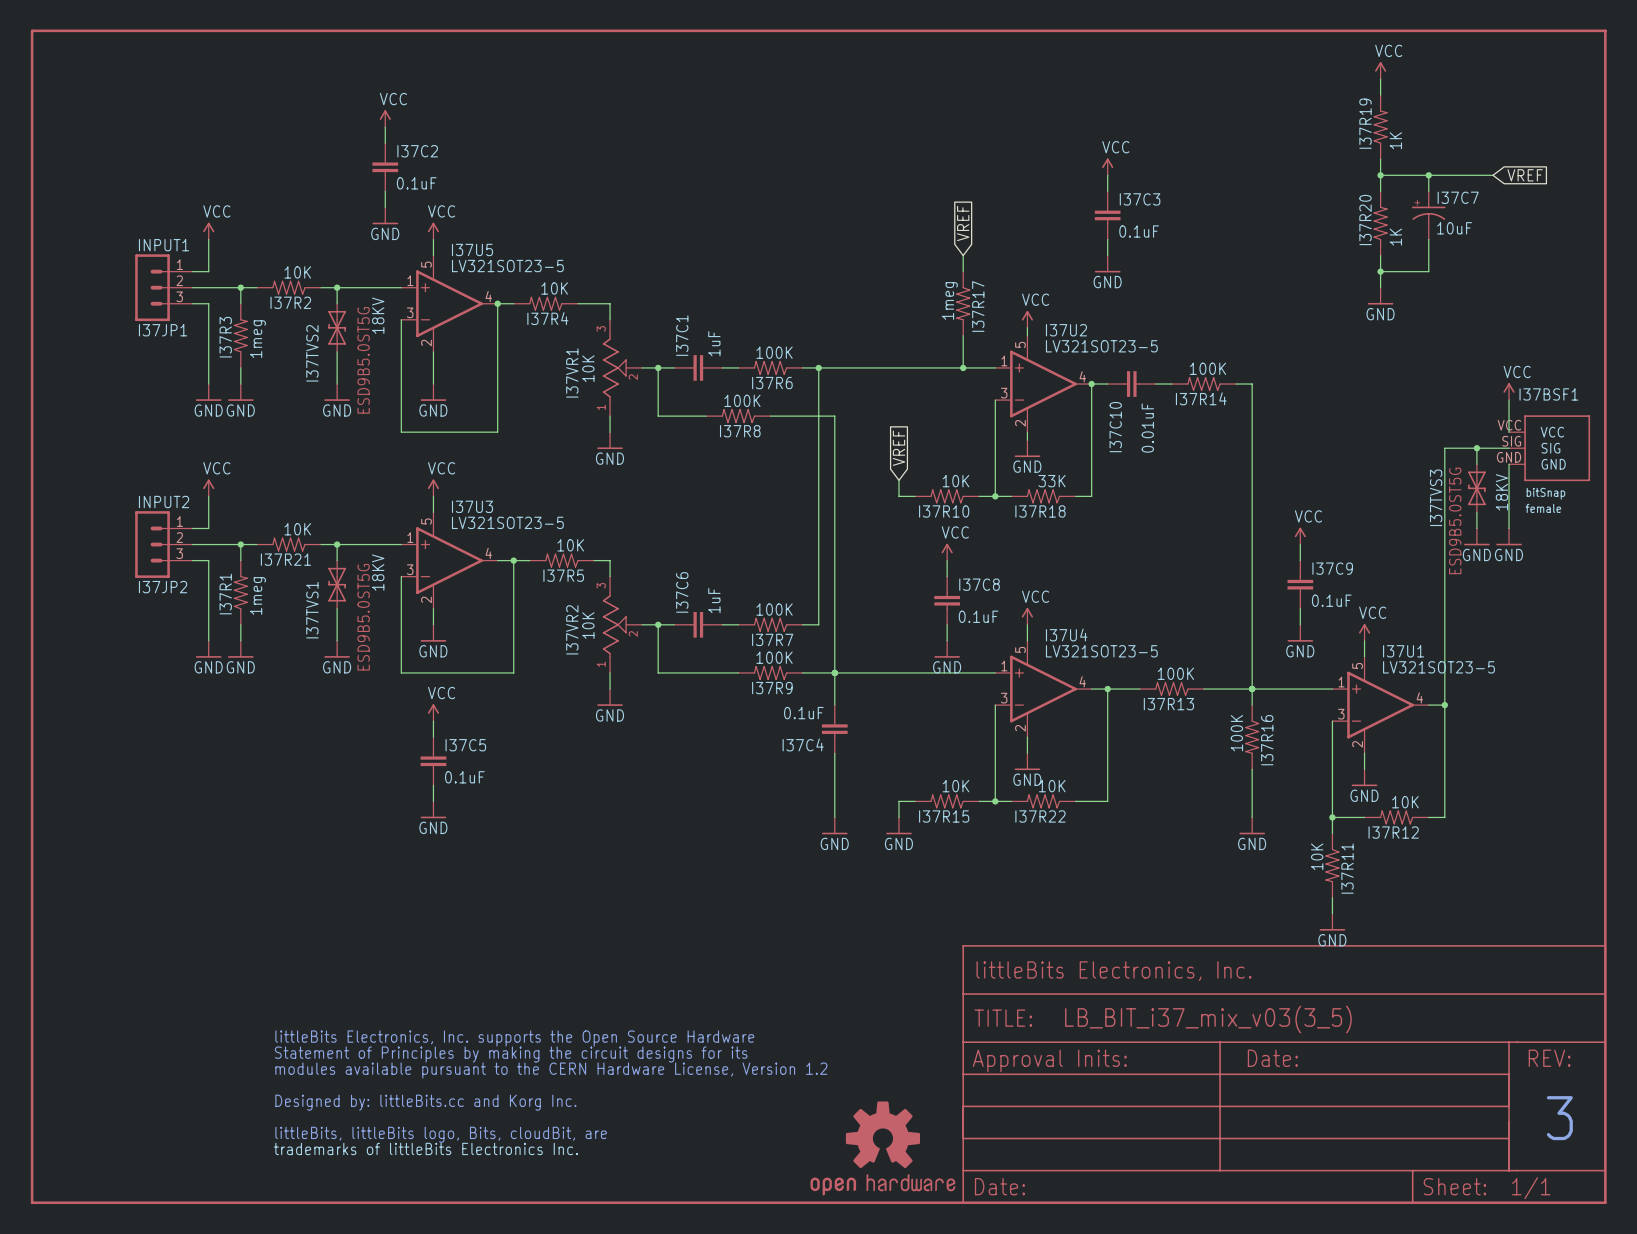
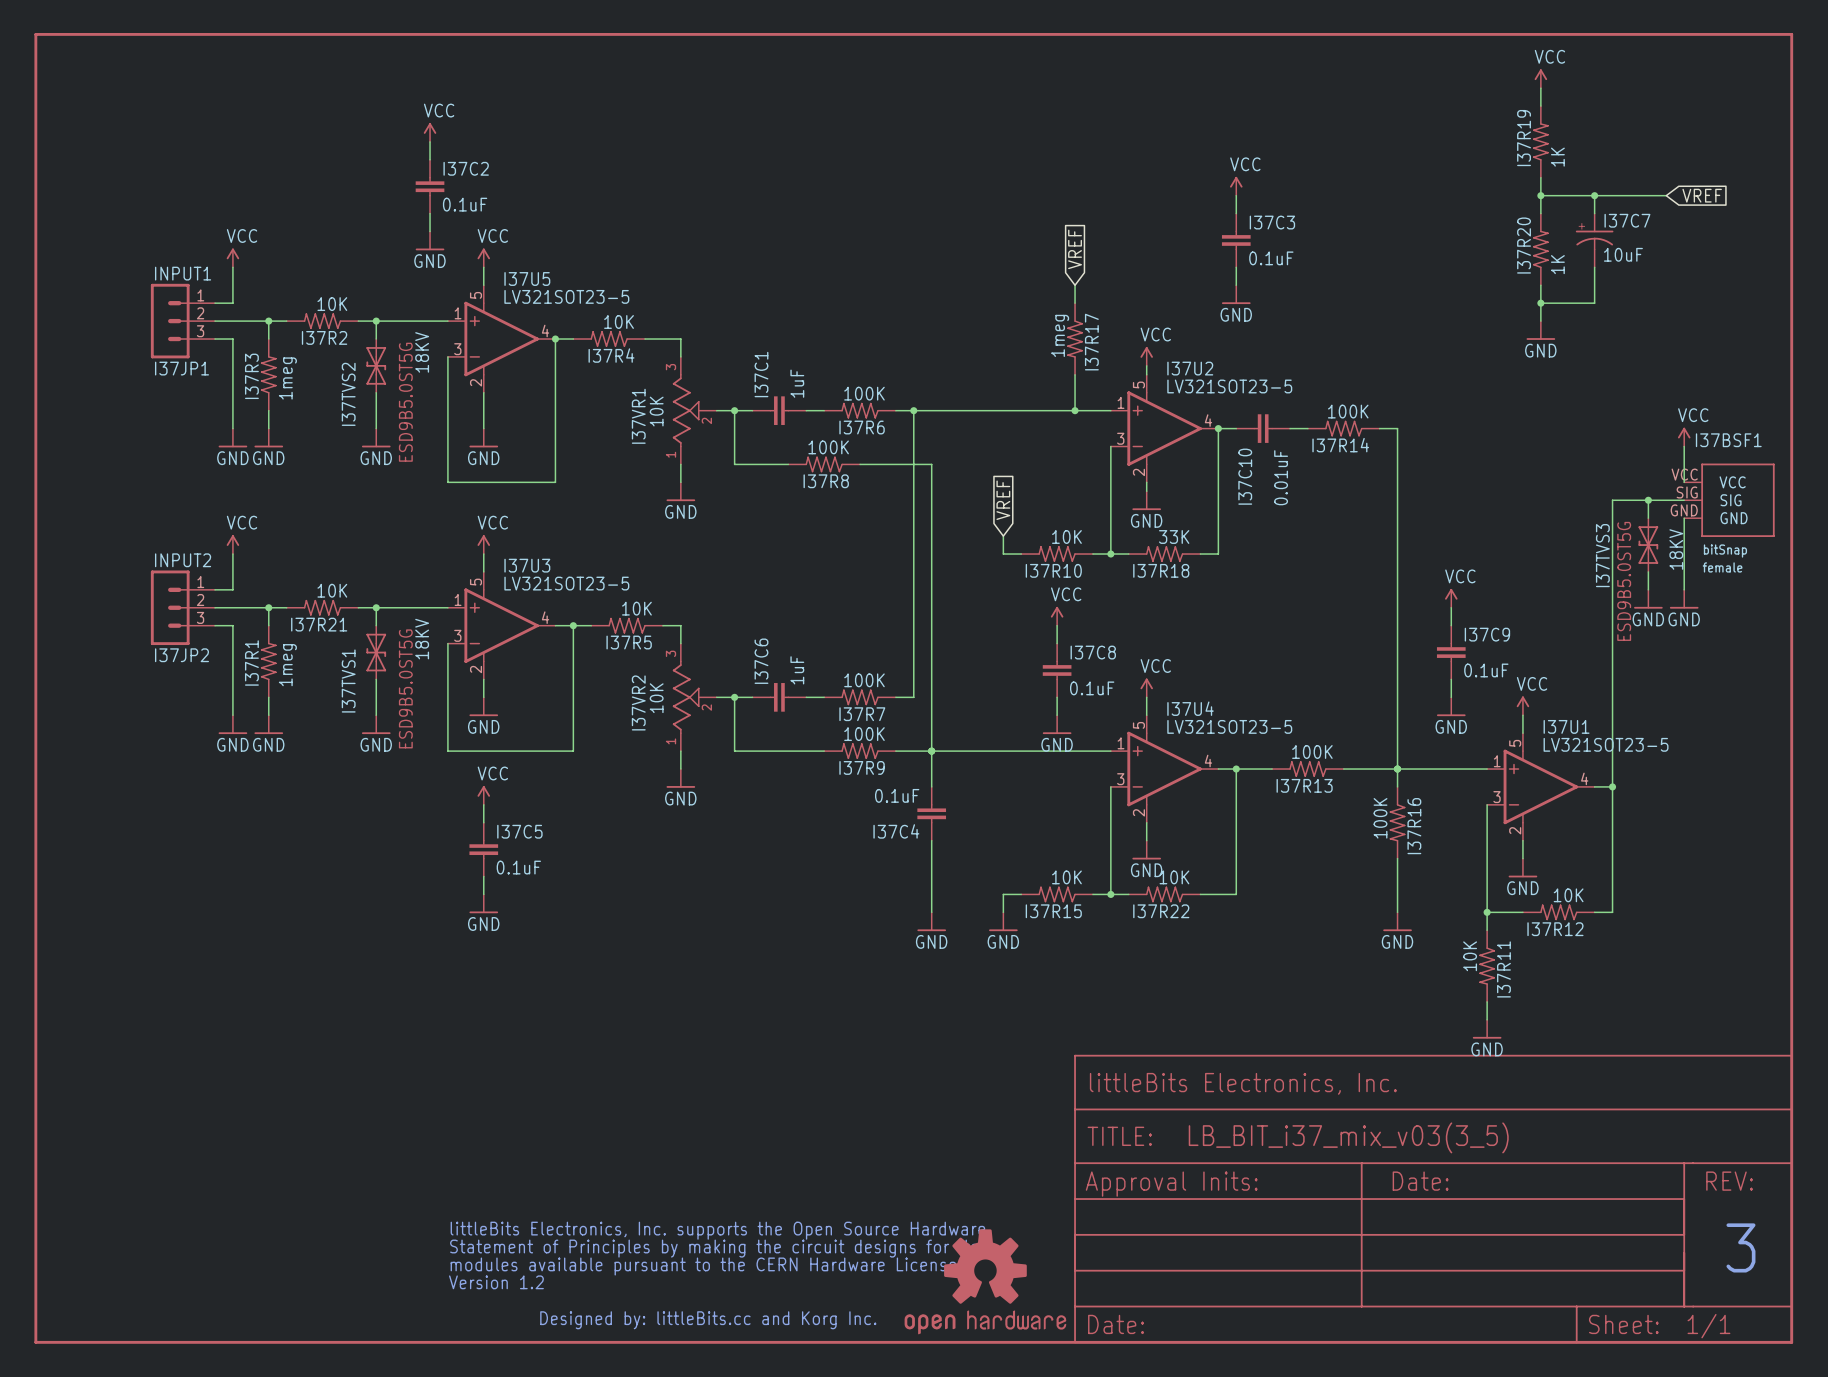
part: (550, 1092) -> none
part: none -> (717, 1275)

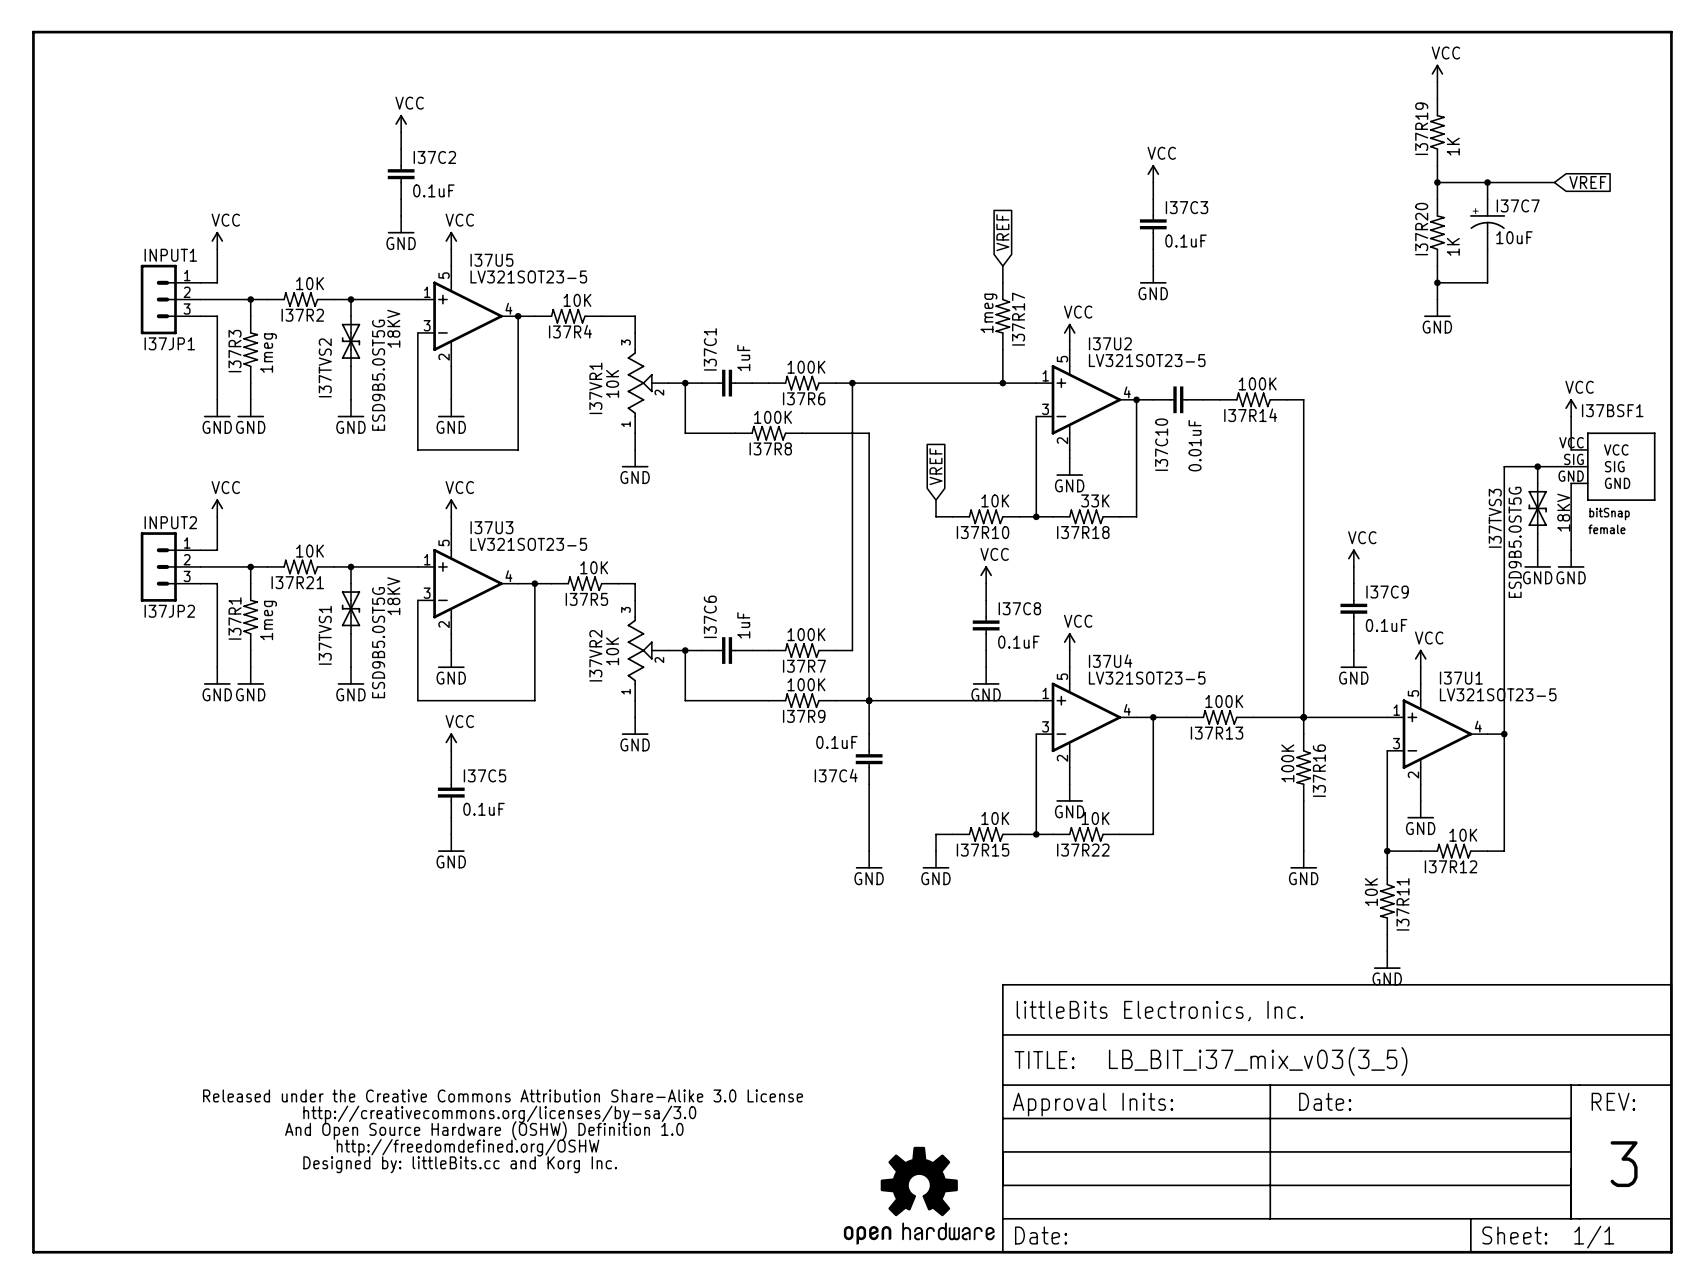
part: none -> (503, 1131)
part: (717, 1275) -> none

